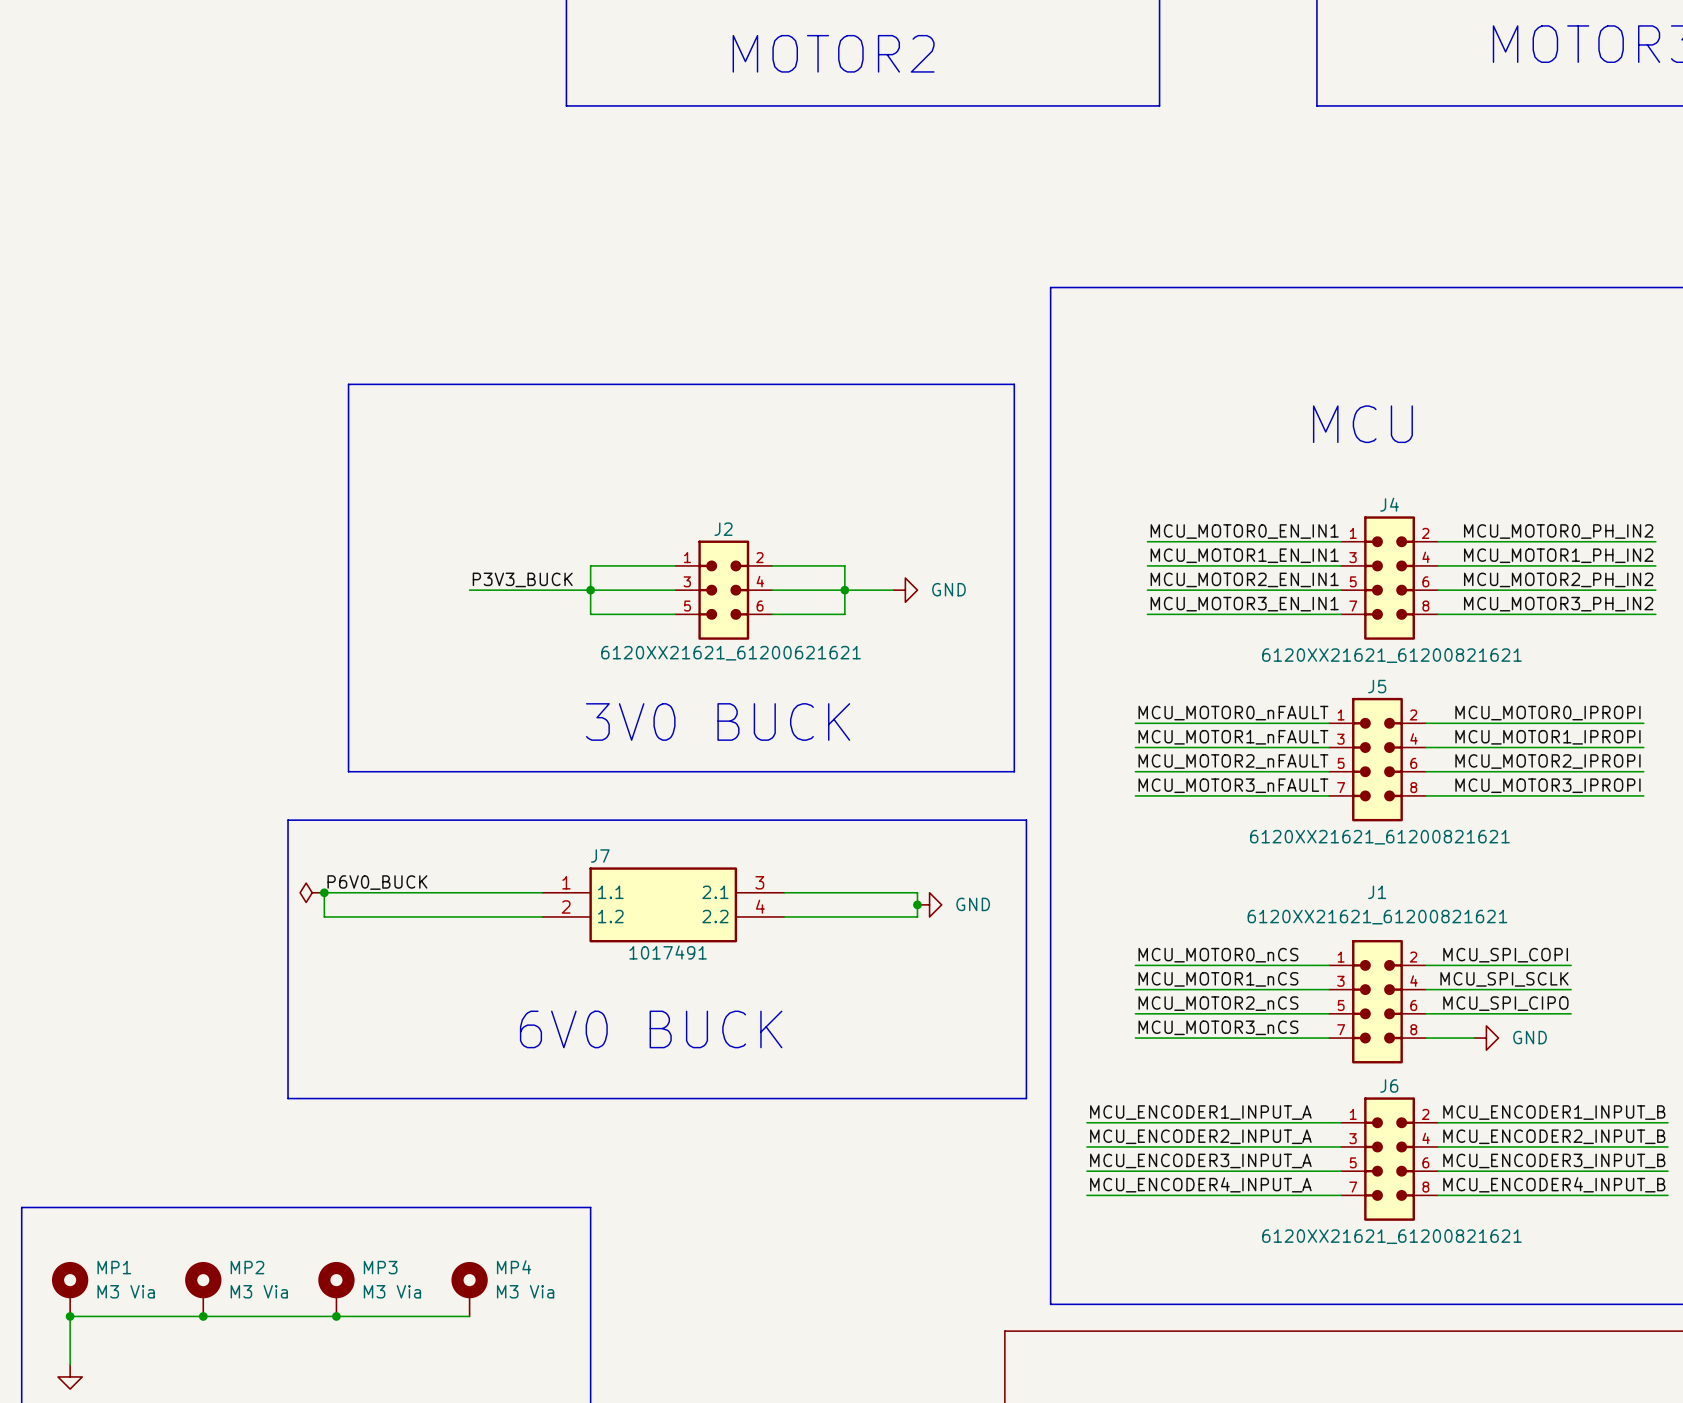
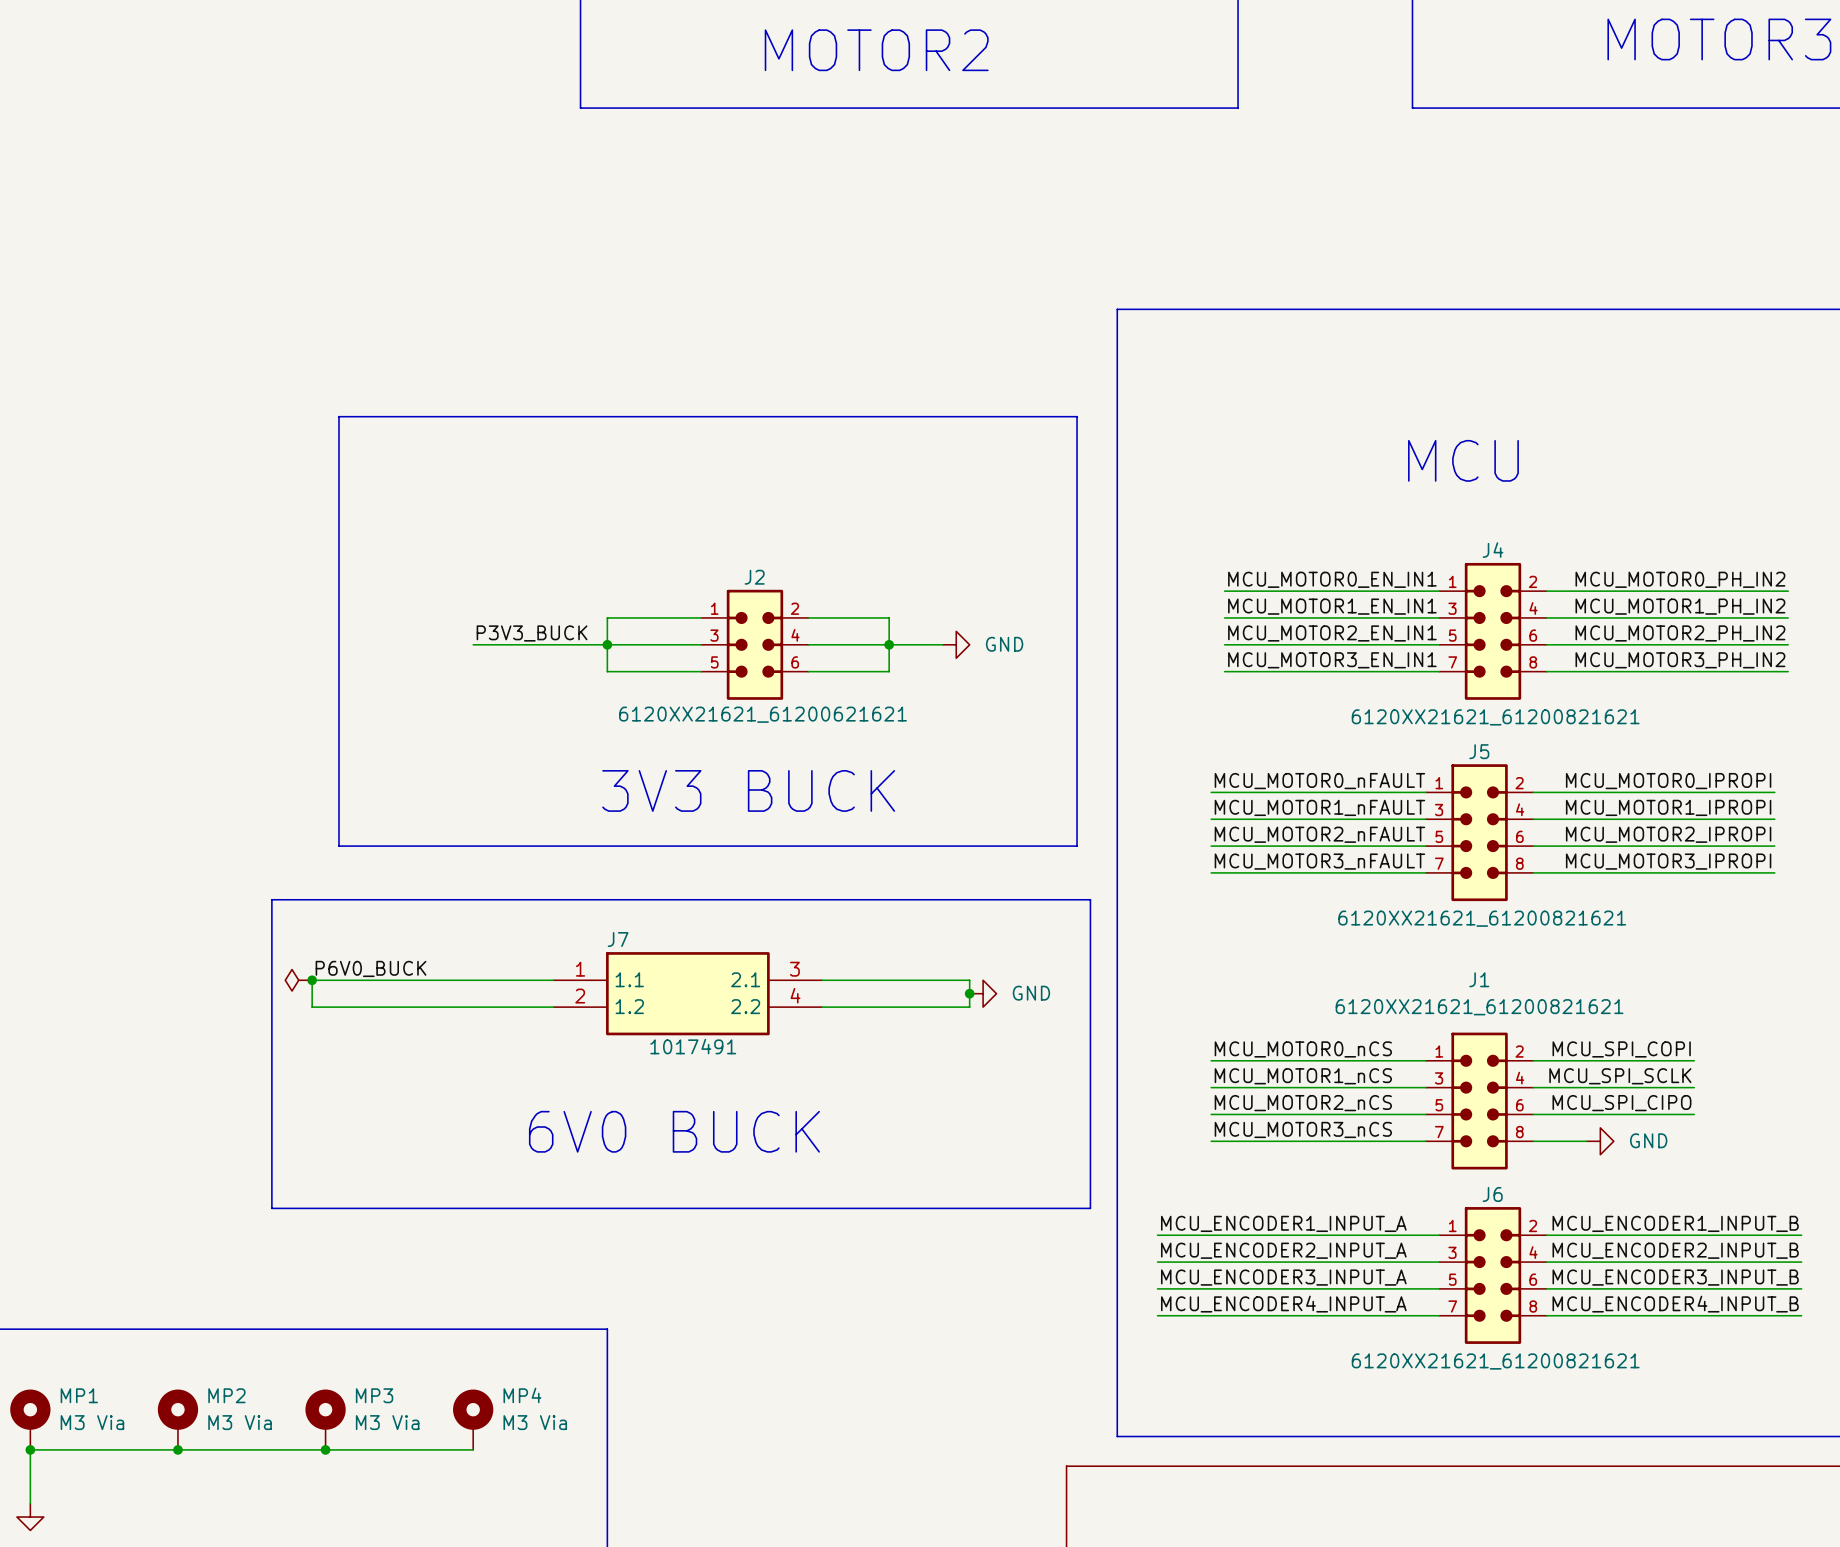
text: 3V0 BUCK (718, 721) -> 3V3 BUCK (748, 790)

